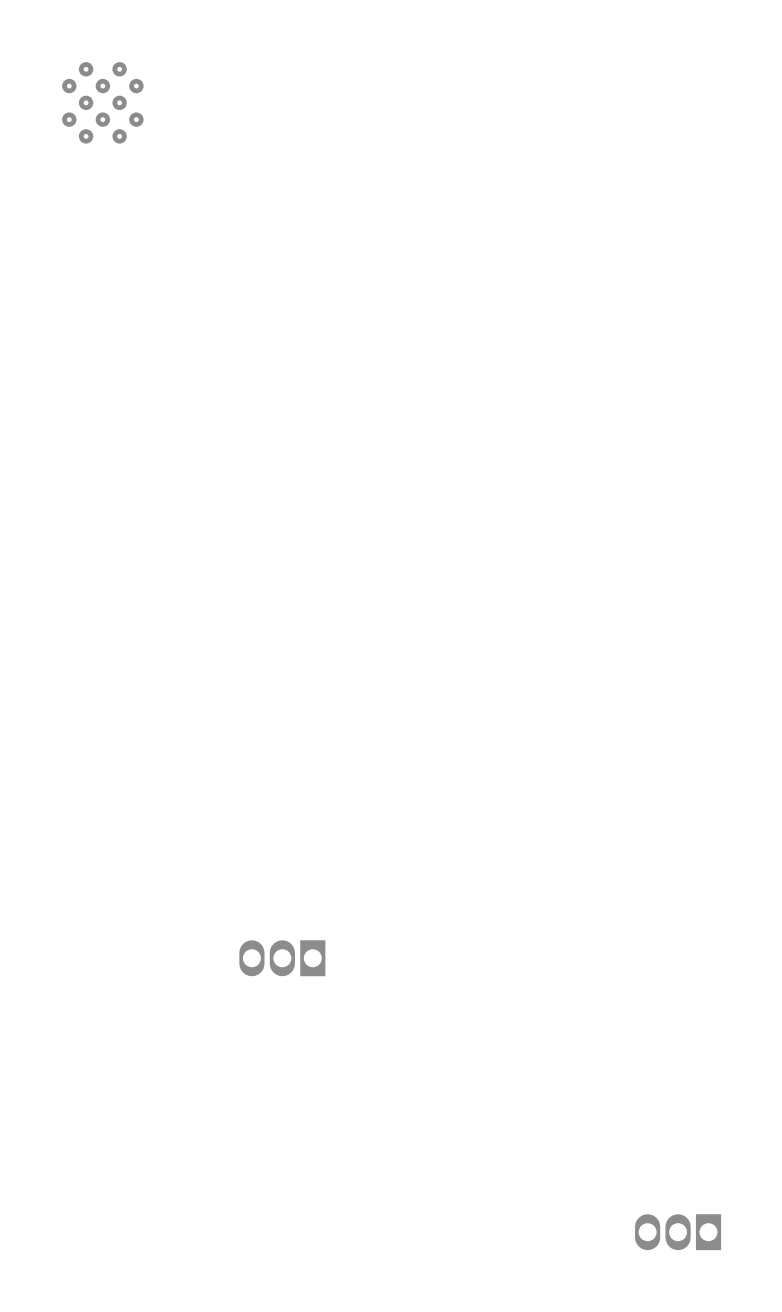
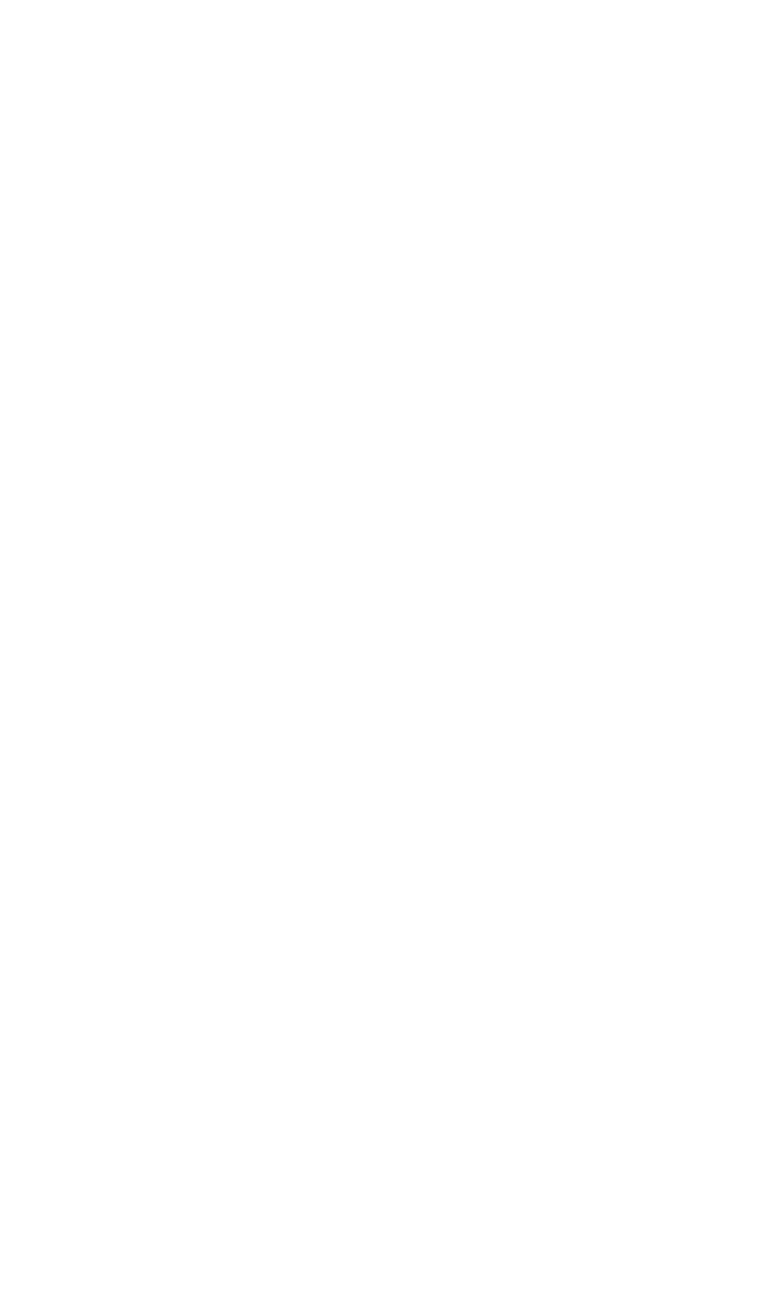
part: (102, 102) -> none
part: (282, 958) -> none
part: (678, 1232) -> none

